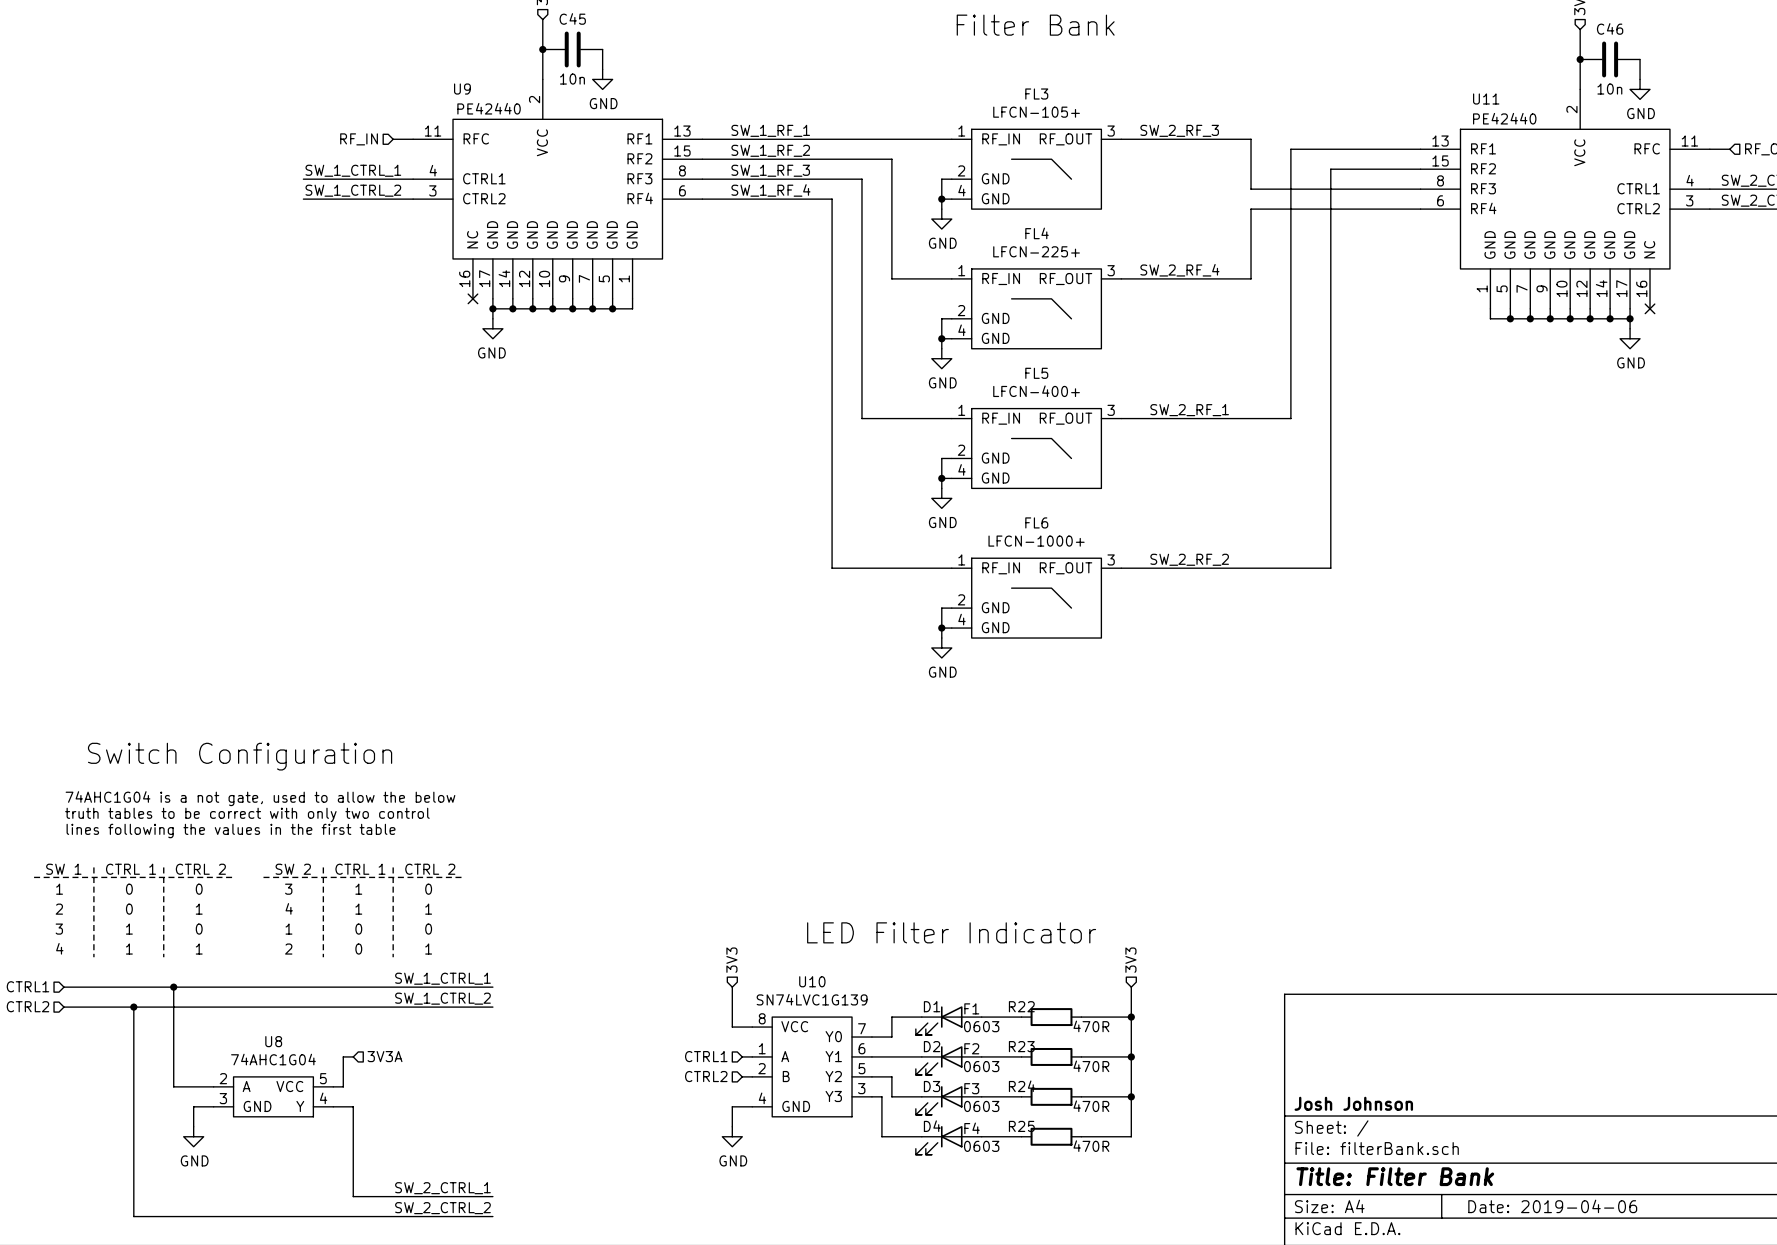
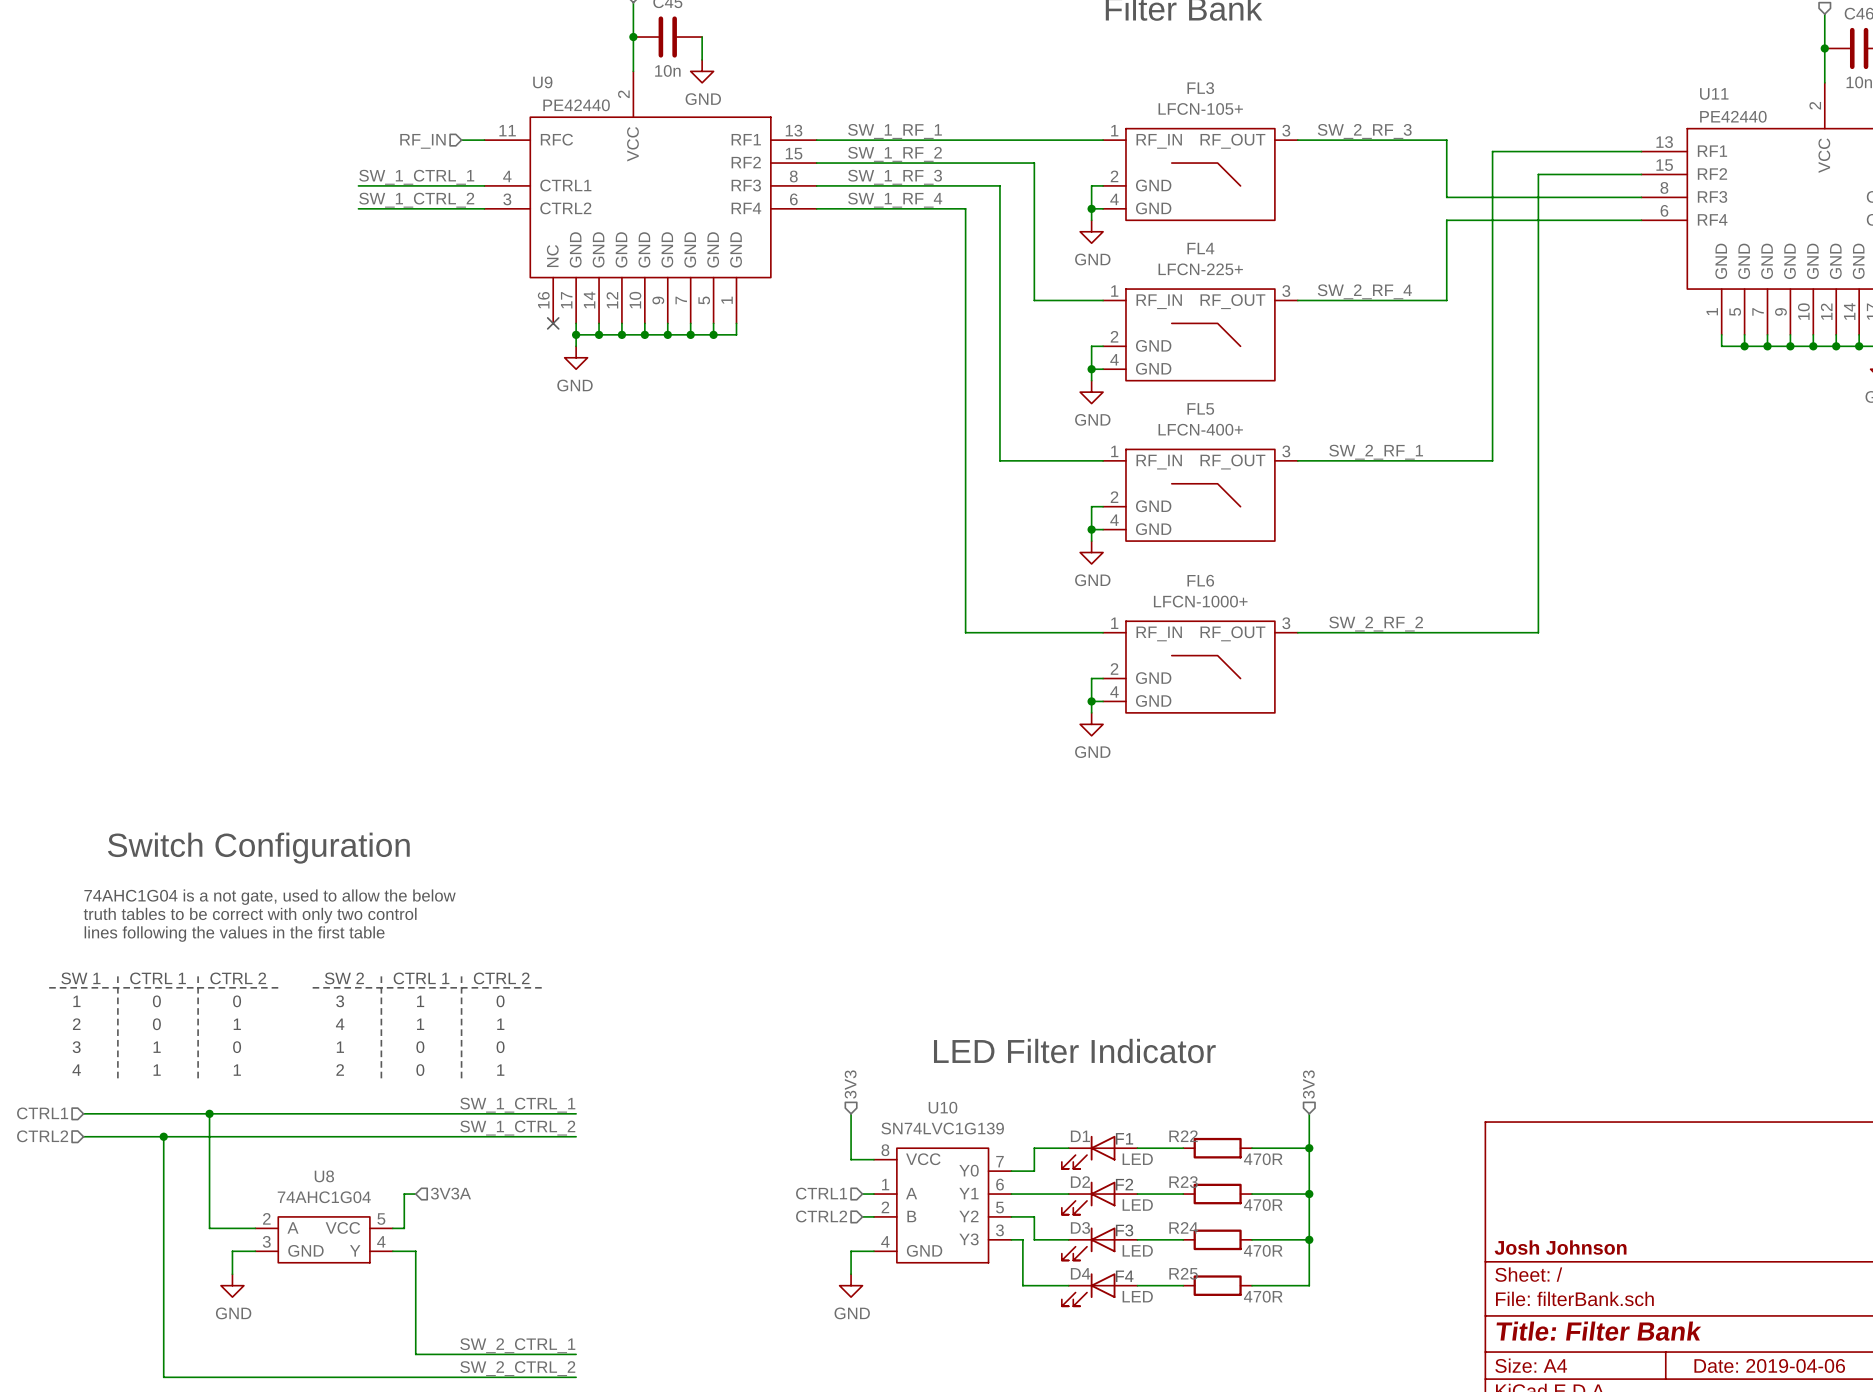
D1 value: 0603 (981, 1026) -> LED (1137, 1159)
D2 value: 0603 (981, 1066) -> LED (1137, 1205)
D3 value: 0603 (981, 1106) -> LED (1137, 1250)
D4 value: 0603 (981, 1146) -> LED (1137, 1296)

